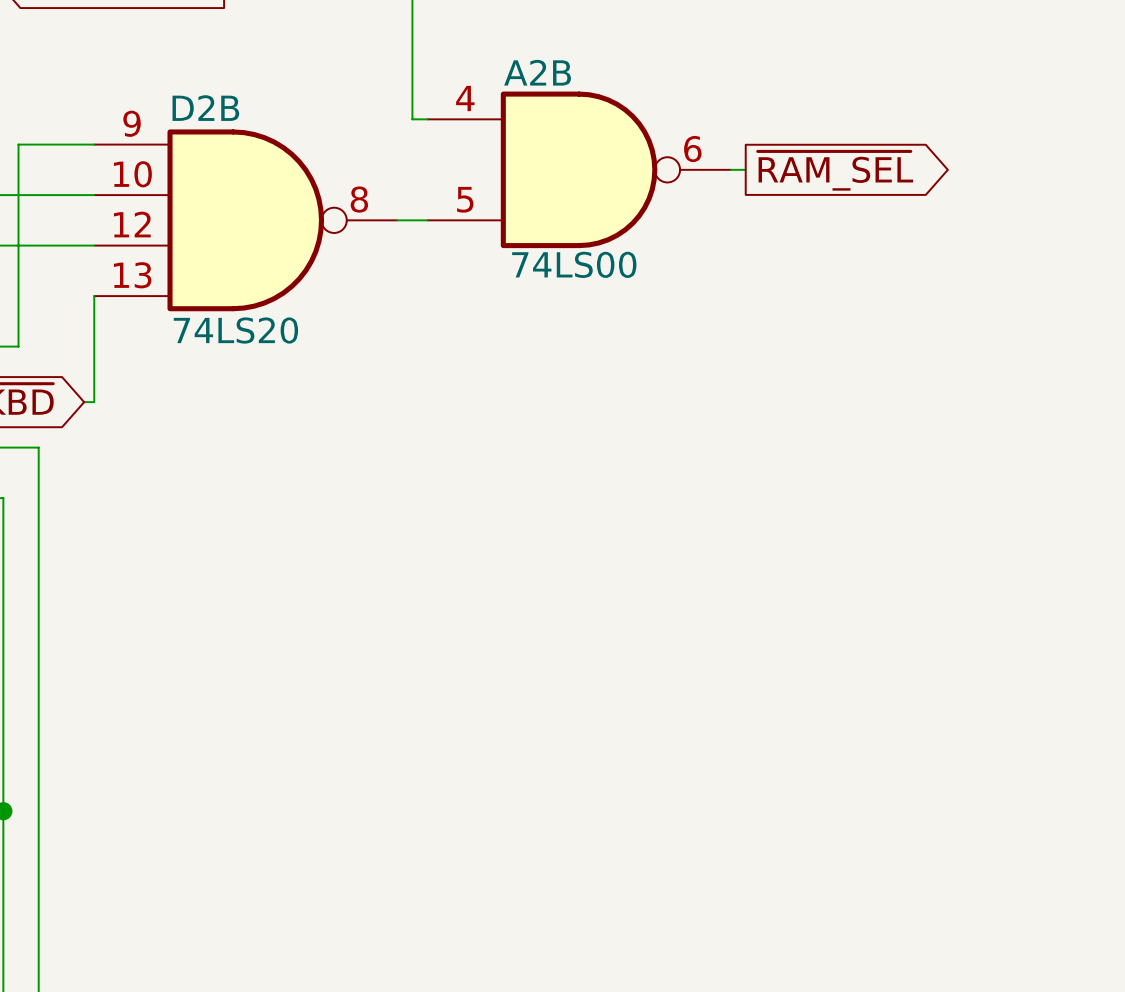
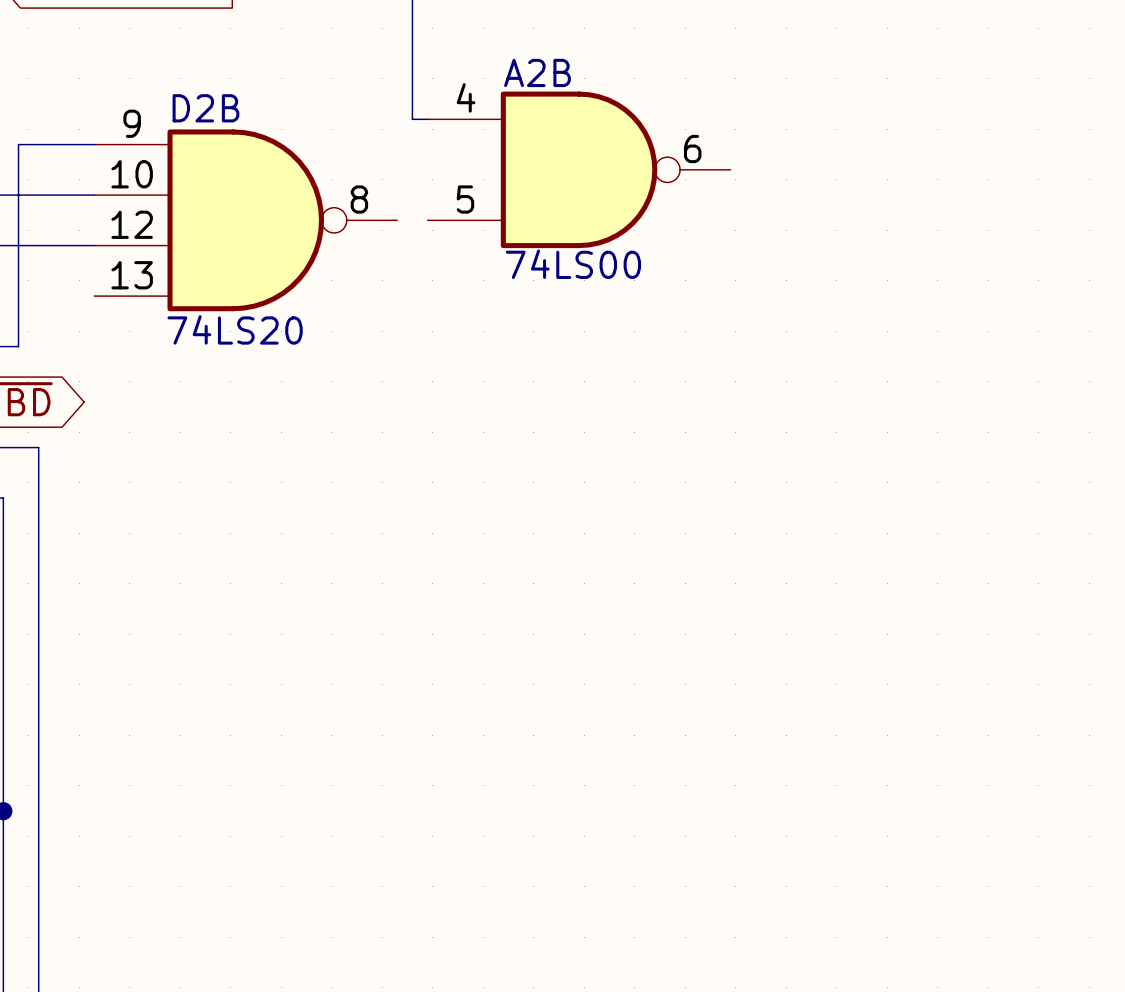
wire: (730, 169) (745, 169) -> none
global label: ~{RAM_SEL} (835, 171) -> none
wire: (397, 220) (427, 220) -> none
wire: (94, 296) (94, 402) (84, 402) -> none

